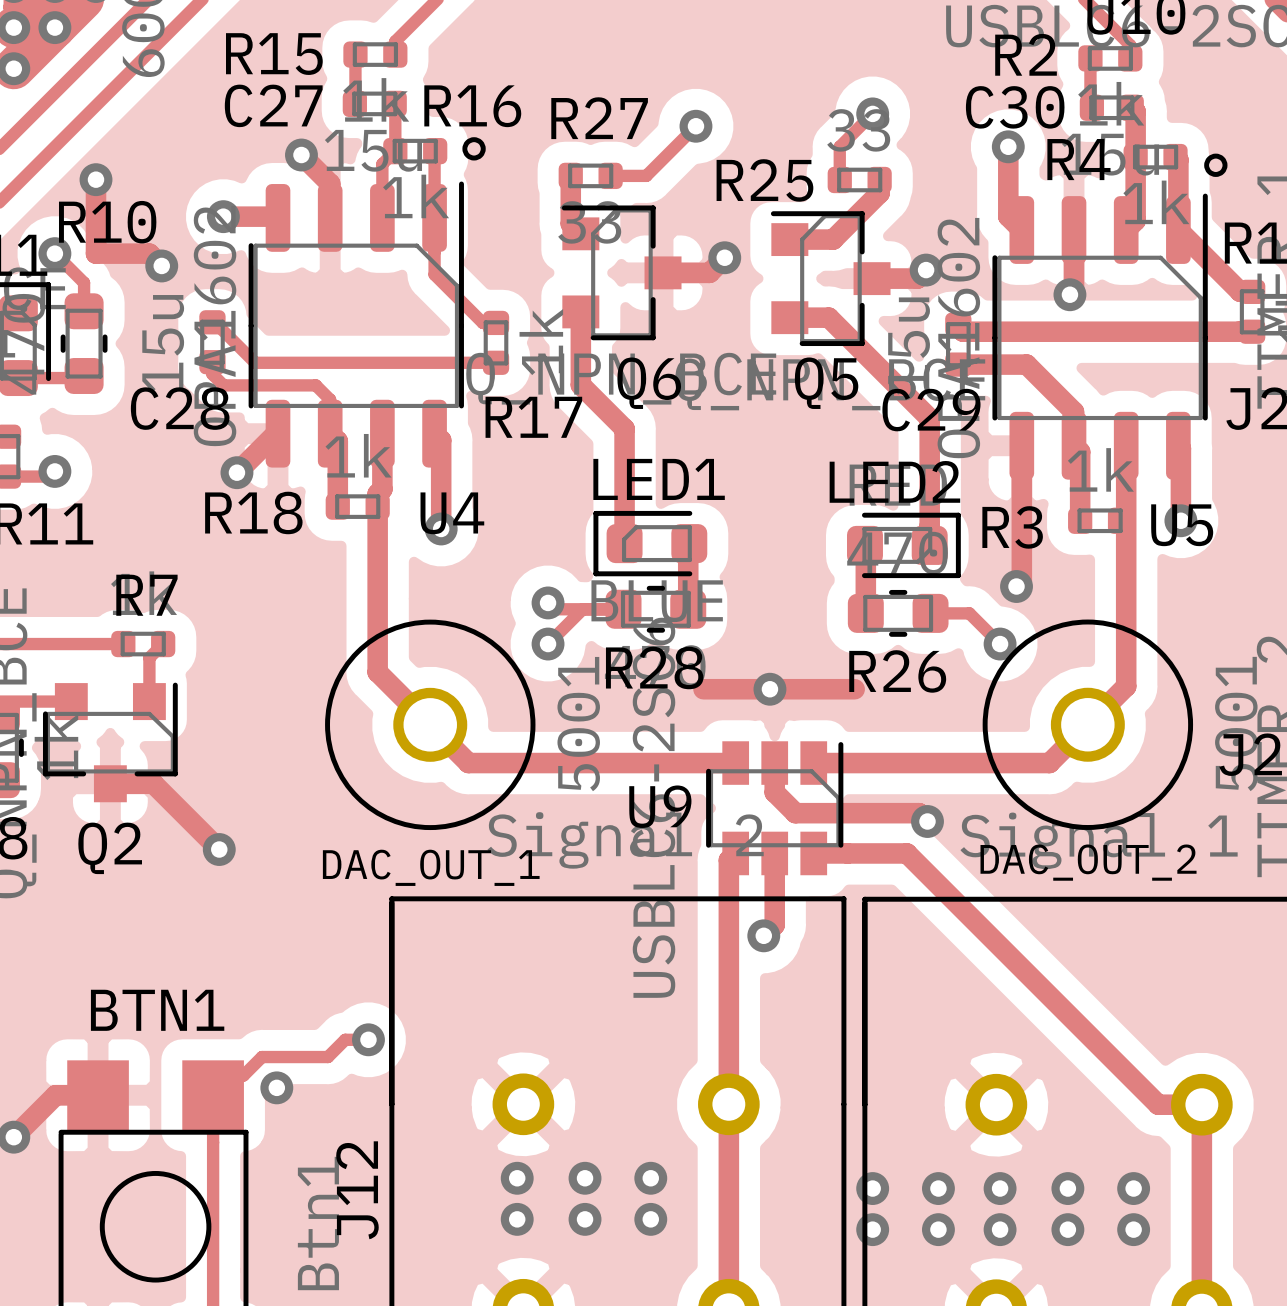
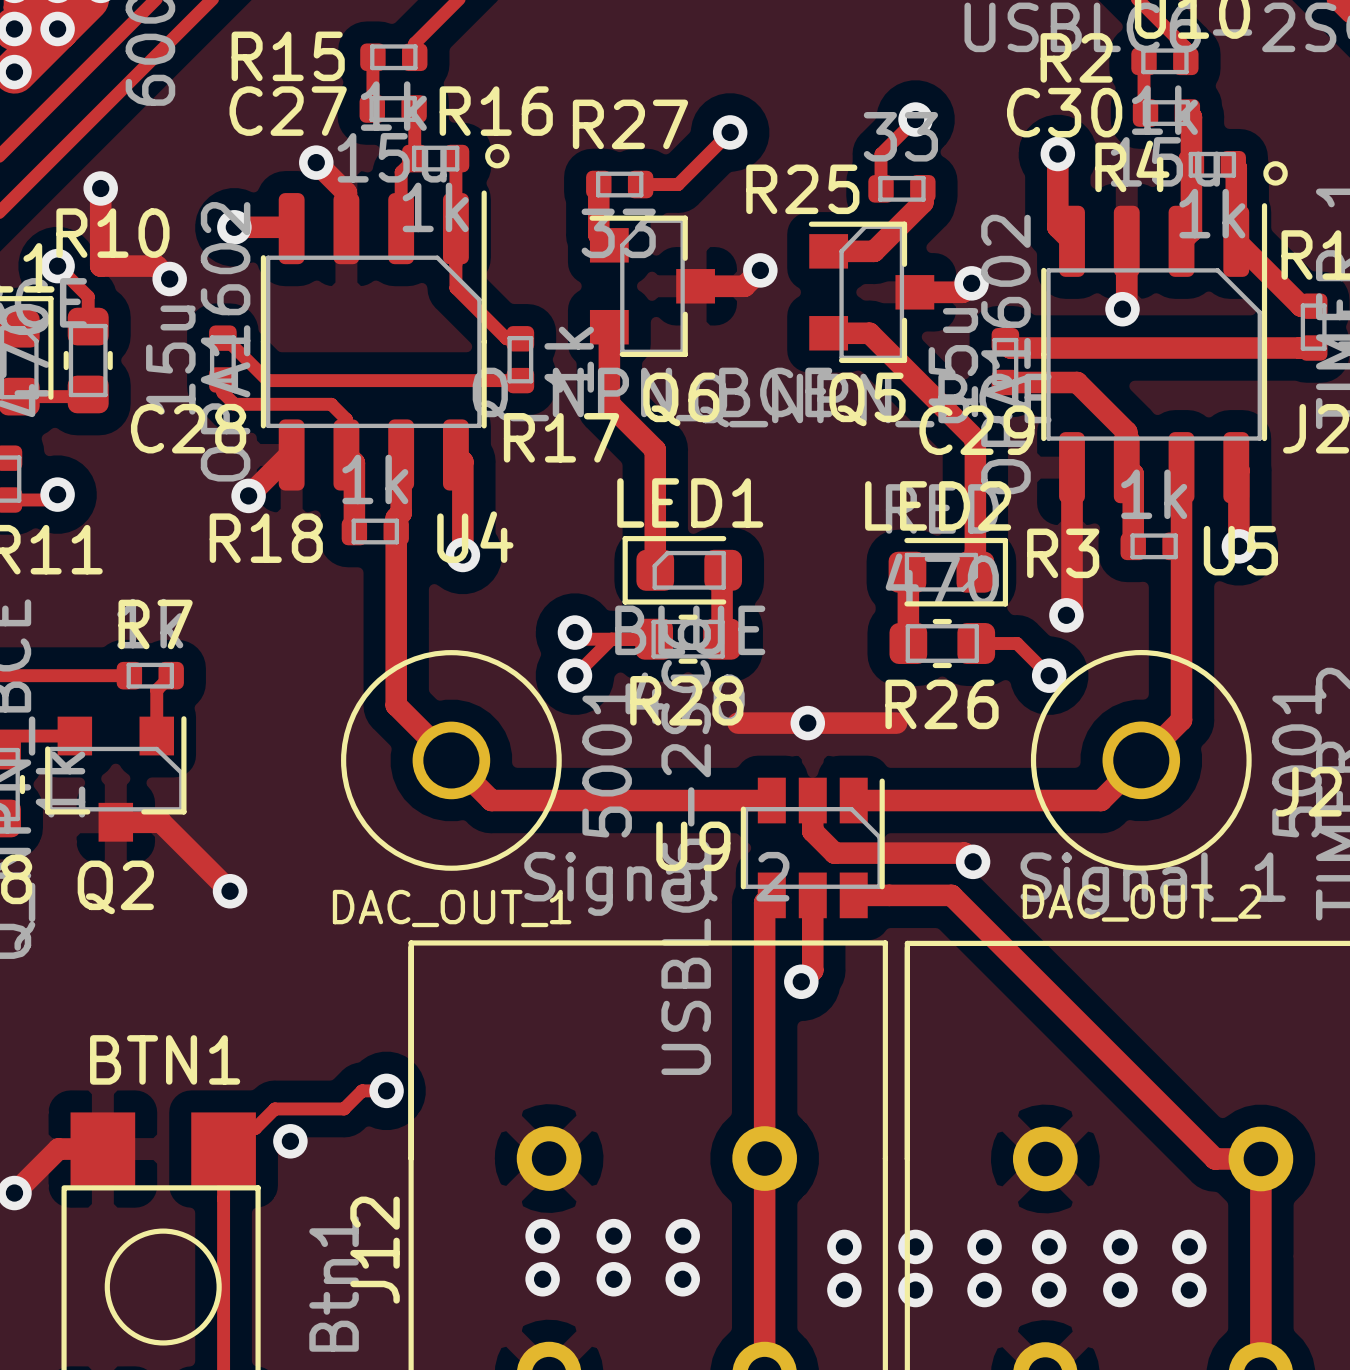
via: none -> (844, 1246)
via: none -> (844, 1290)

